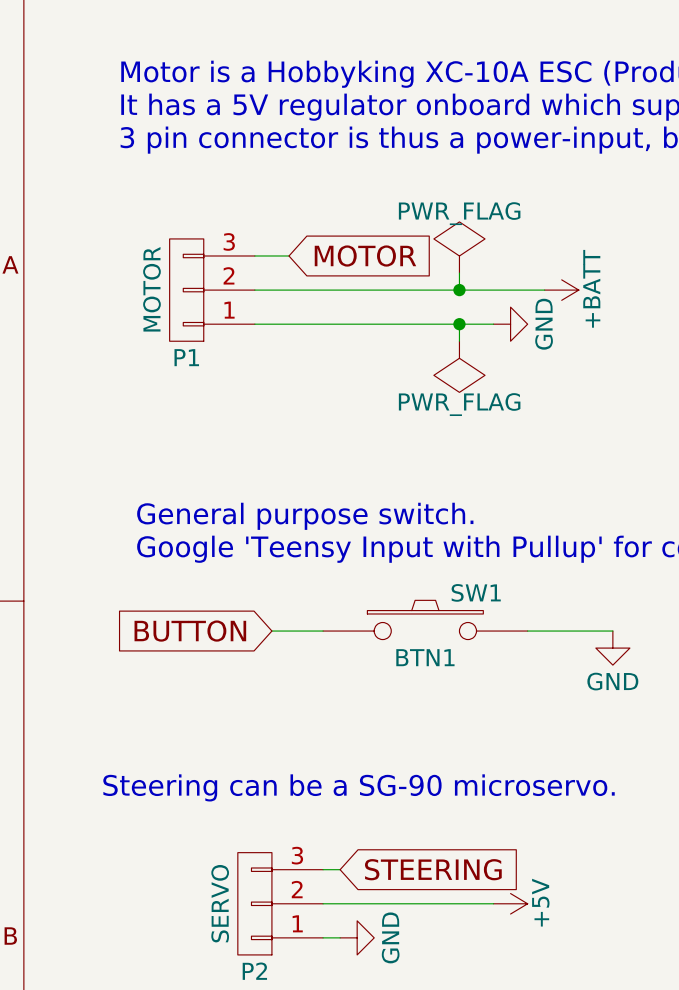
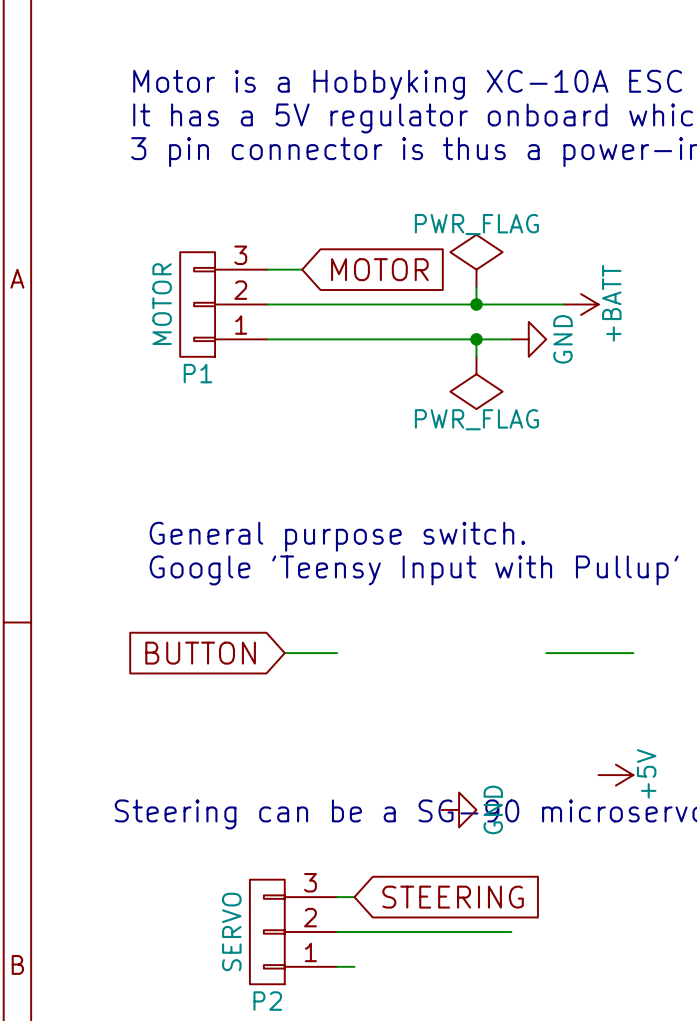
SW1: BTN1 (425, 619) -> none
power symbol: GND (612, 648) -> none
power symbol: none -> GND (459, 809)
power symbol position: +5V (510, 903) -> +5V (615, 775)
power symbol: GND (357, 937) -> none

